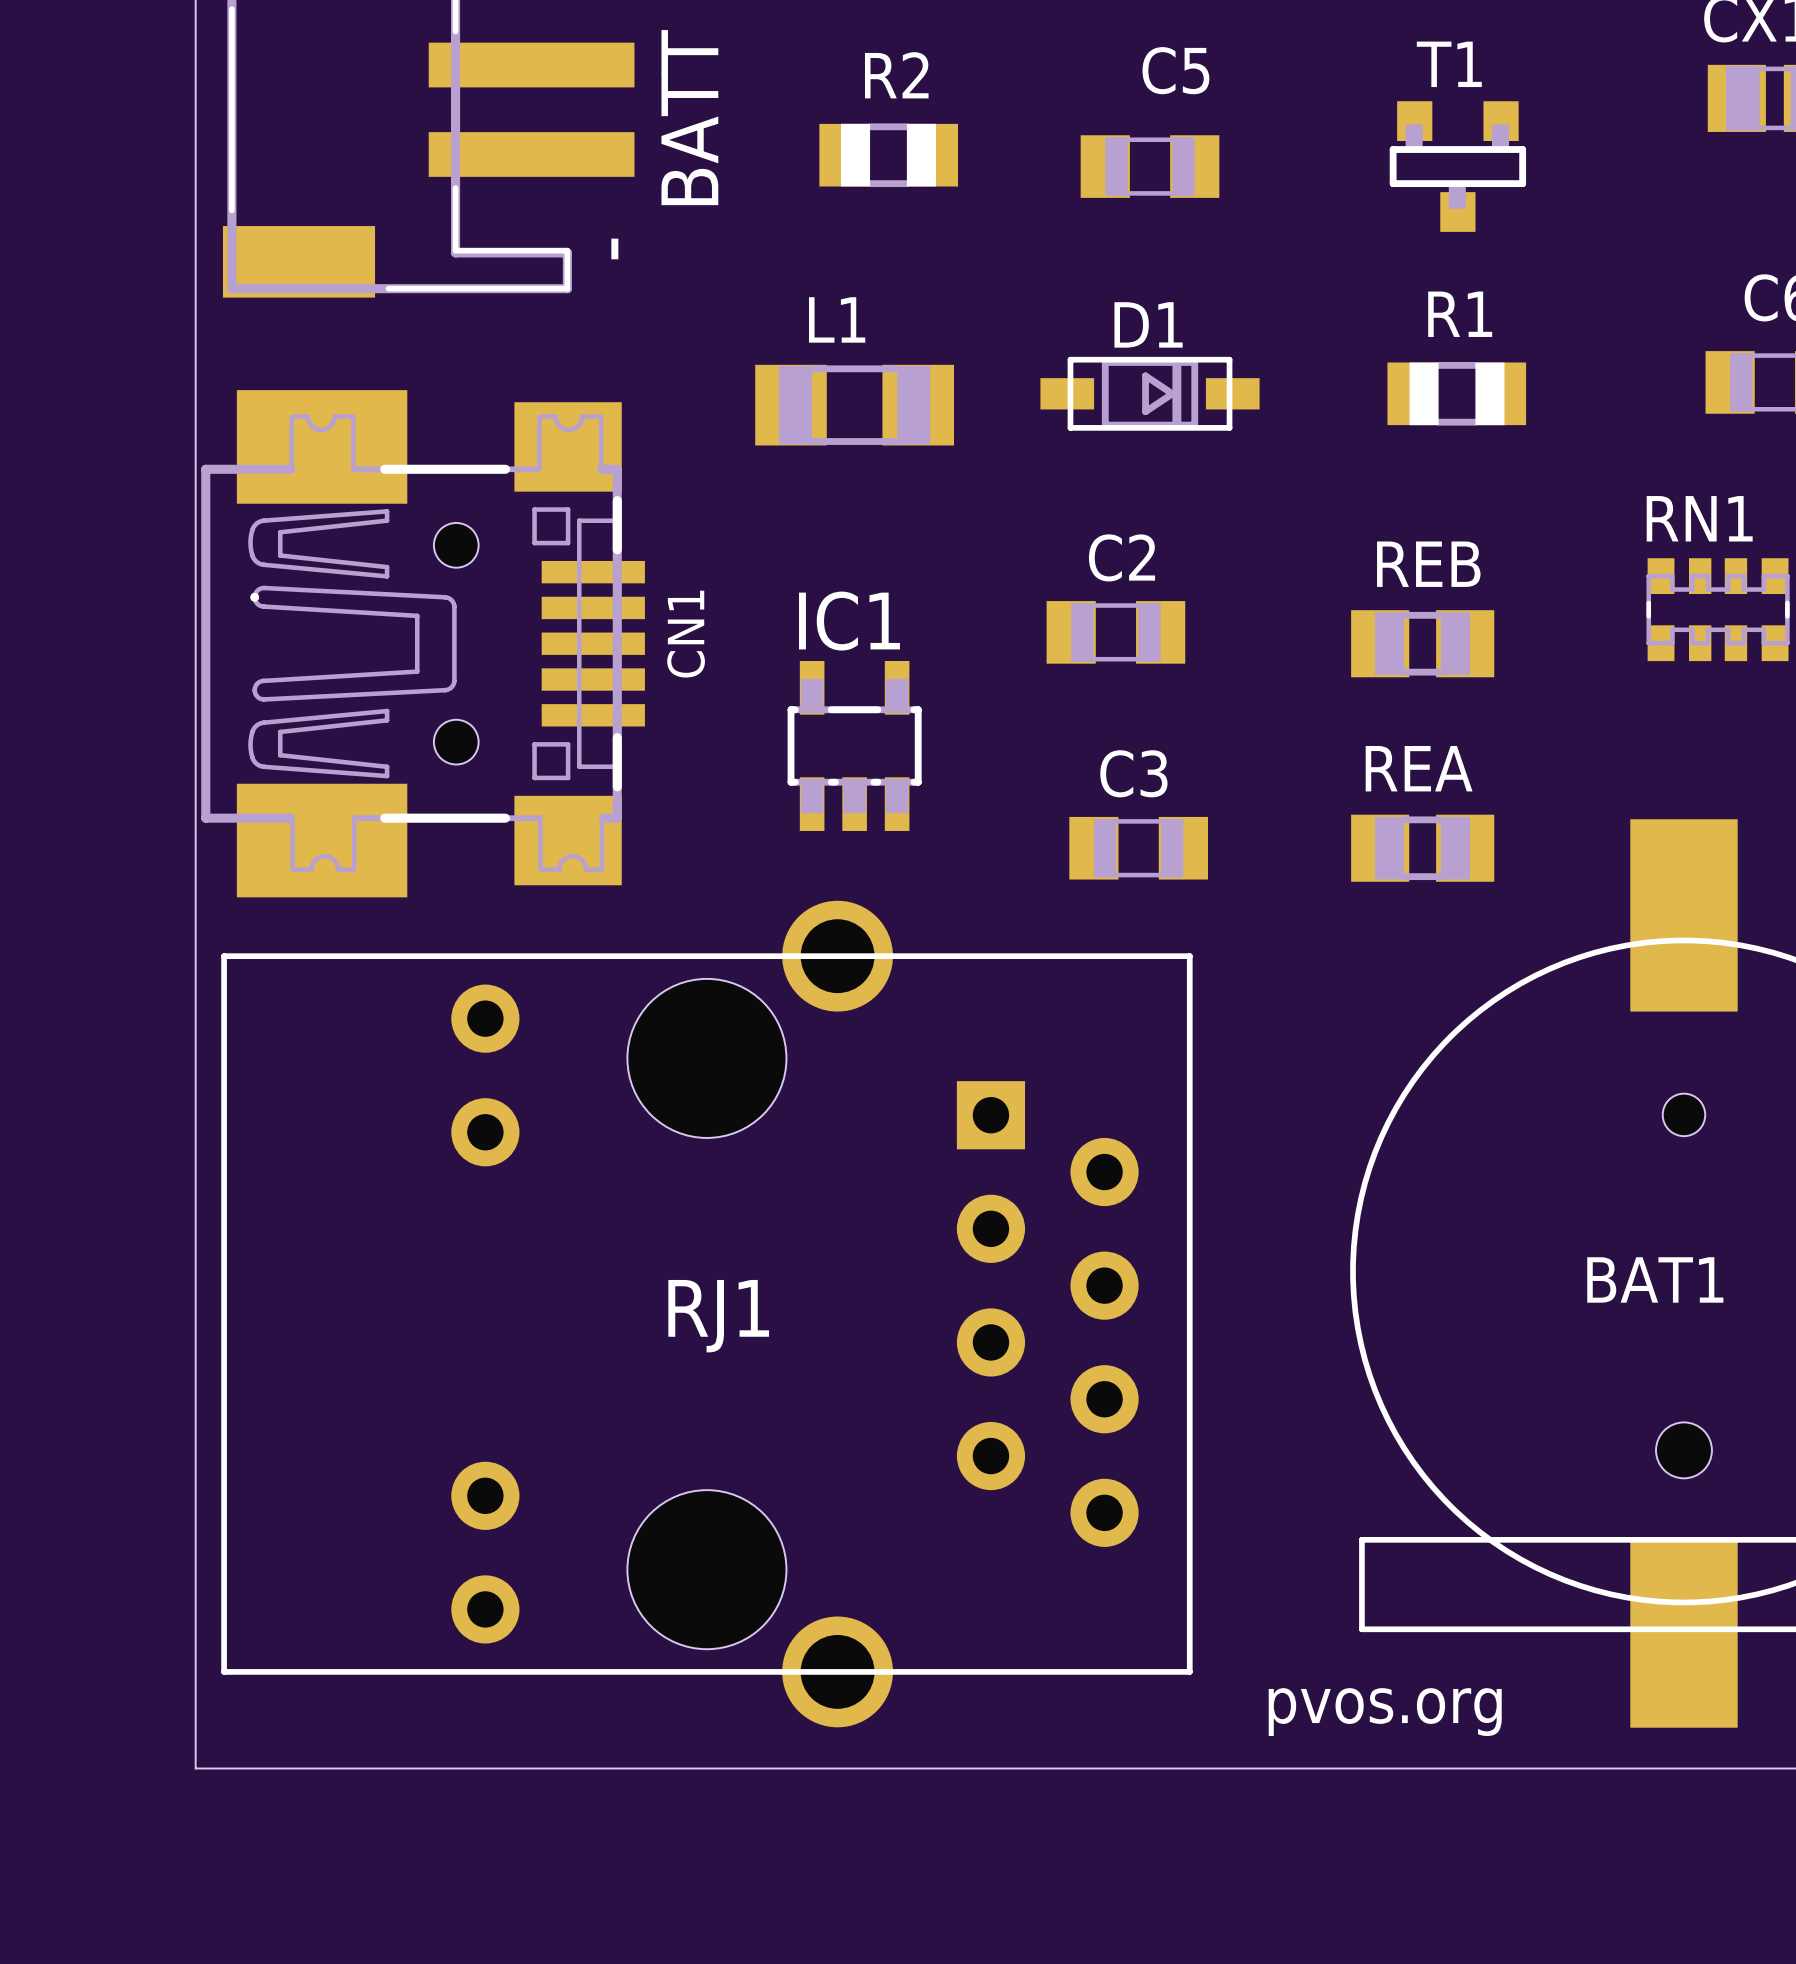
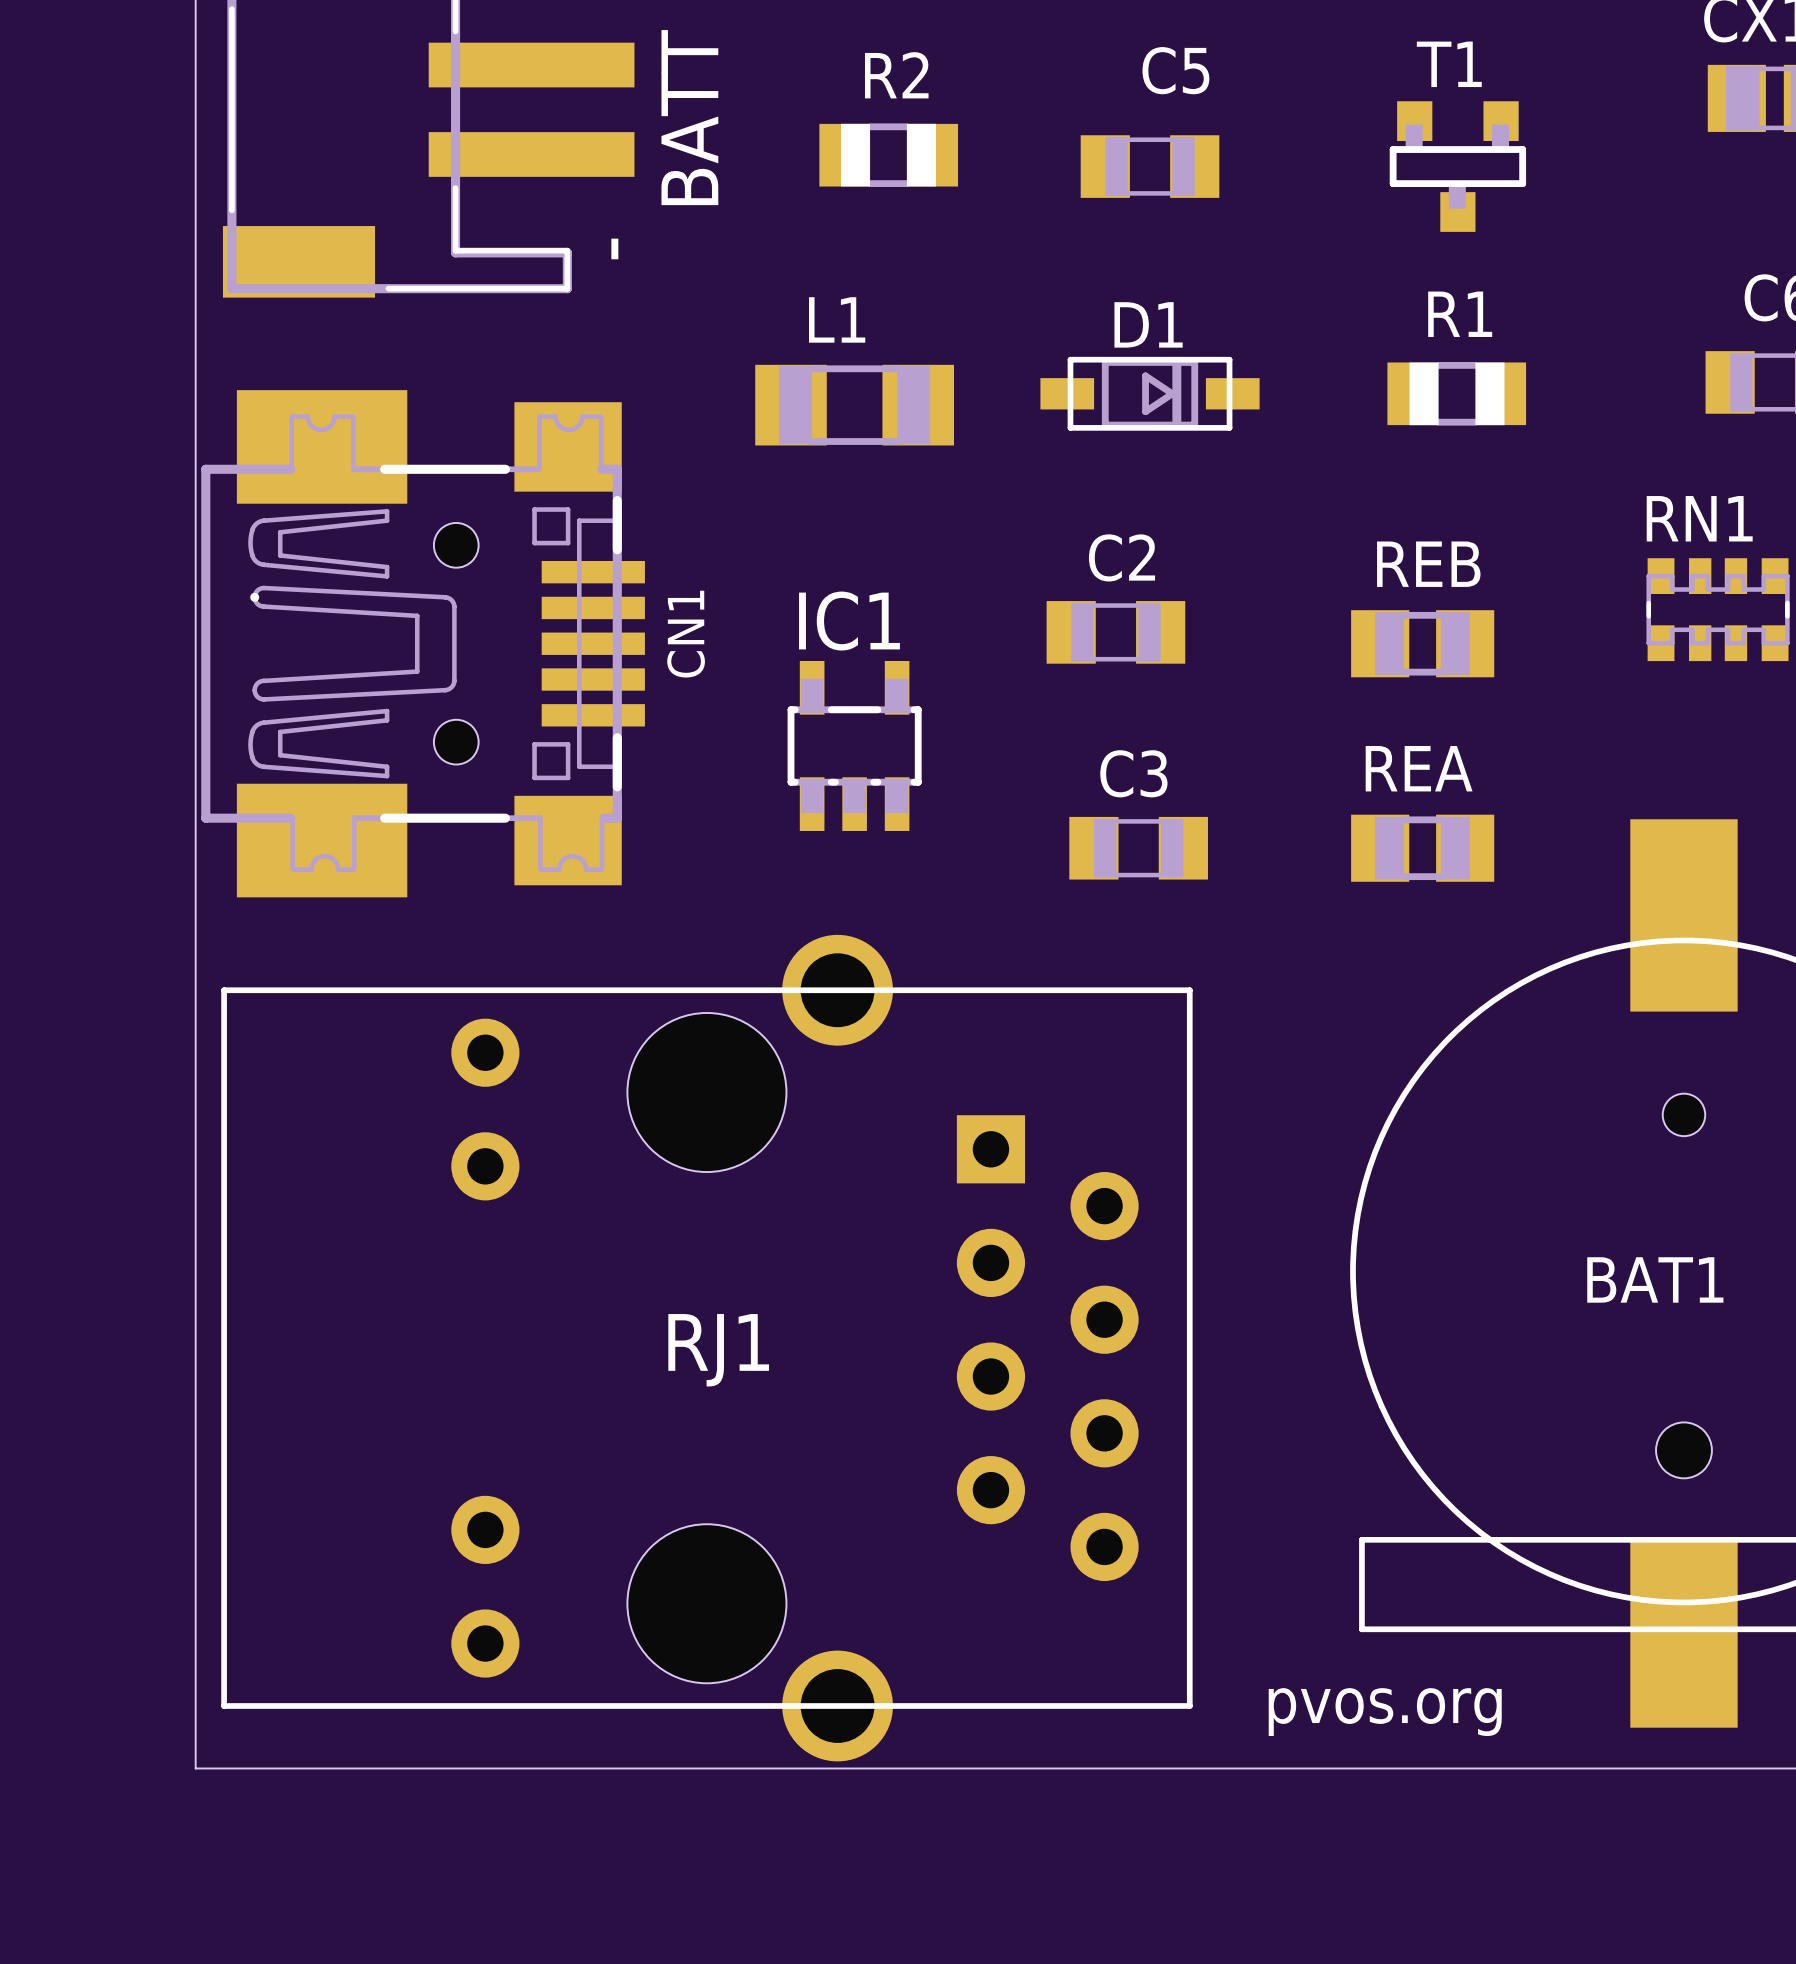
RJ1 position: (706, 1314) -> (706, 1348)

